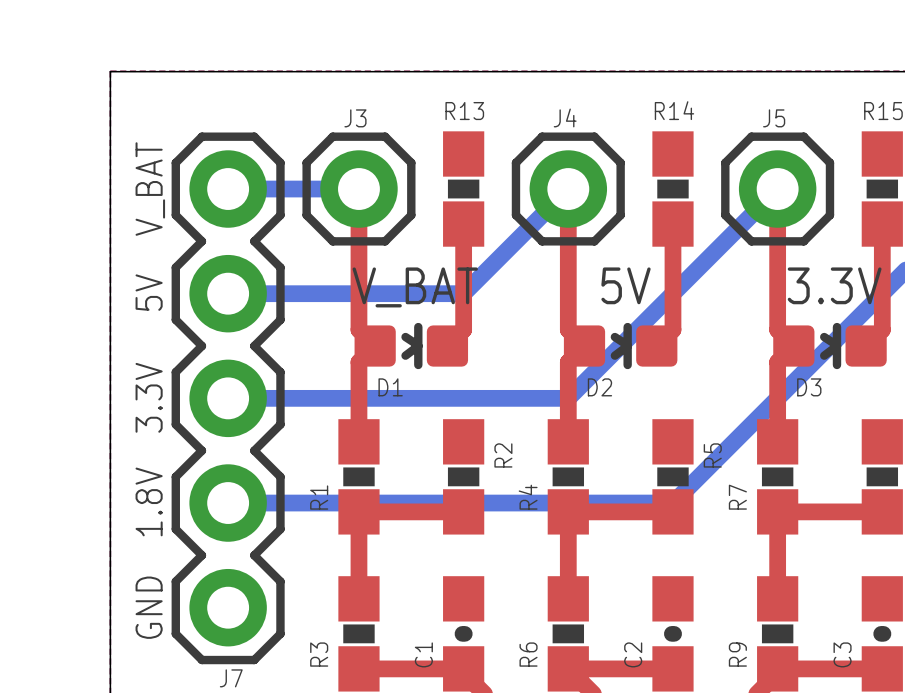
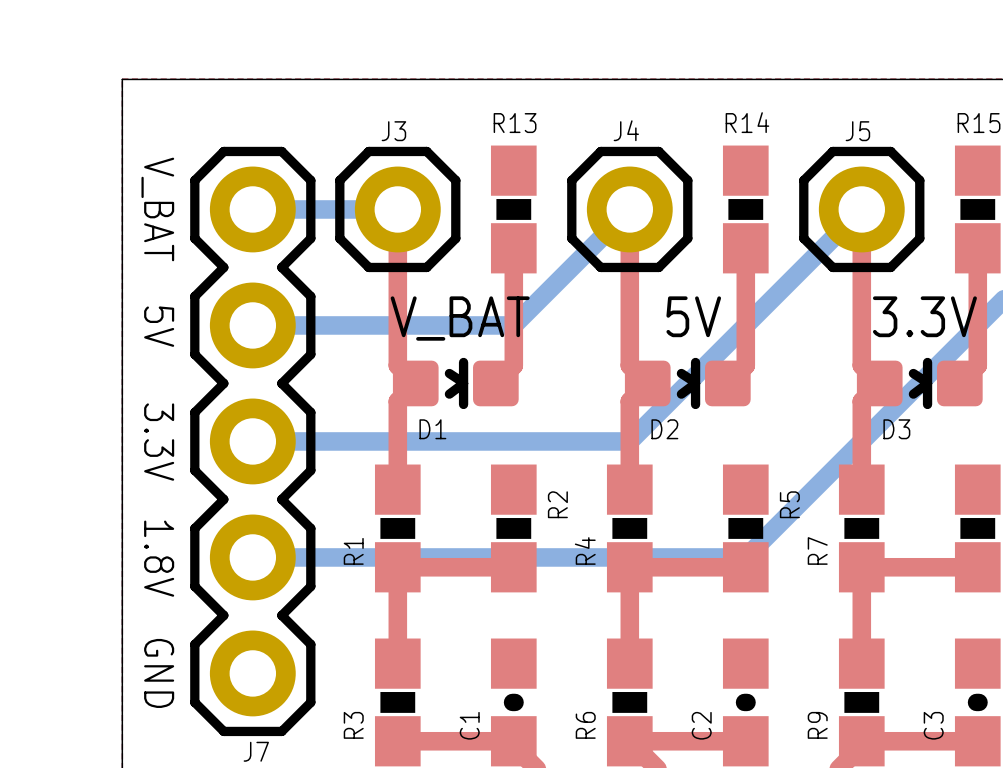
text rotation: 0° (150, 189) -> 180° (157, 209)
text rotation: 0° (149, 292) -> 180° (159, 326)
text rotation: 0° (149, 397) -> 180° (159, 442)
text rotation: 0° (149, 501) -> 180° (159, 558)
text rotation: 0° (149, 607) -> 180° (159, 673)

